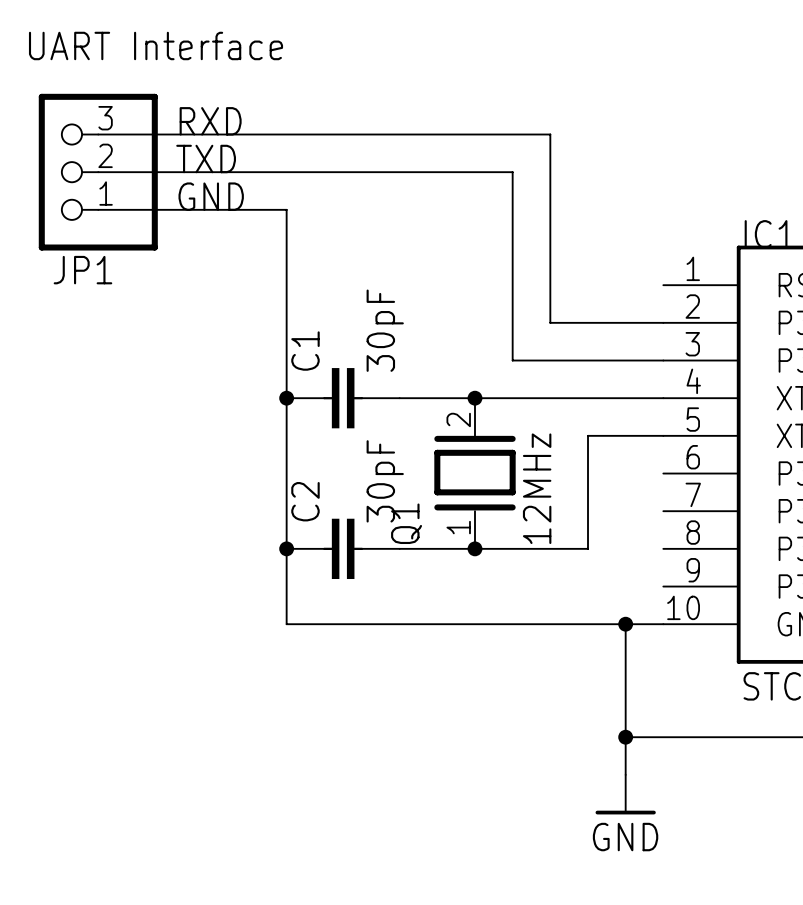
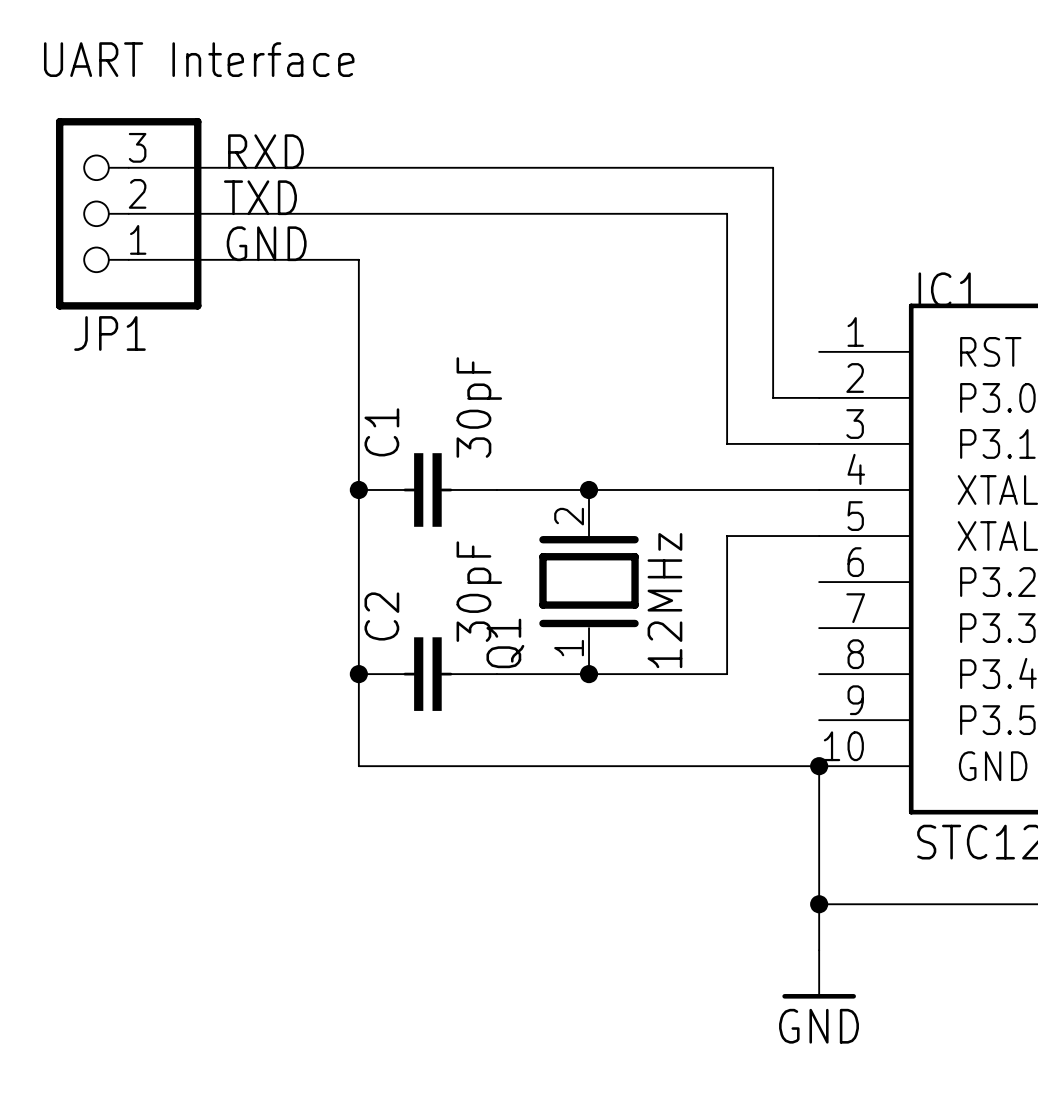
wire: (550, 134) (550, 322) (625, 322) -> (681, 167) (773, 167) (773, 397)
wire: (512, 172) (512, 360) (588, 360) -> (635, 213) (727, 213) (727, 443)
wire: (625, 624) (625, 774) -> (819, 766) (819, 950)
junction position: (625, 624) -> (819, 766)
wire: (625, 737) (663, 737) -> none
junction position: (625, 737) -> (819, 904)
power symbol position: GND (625, 794) -> GND (819, 974)

